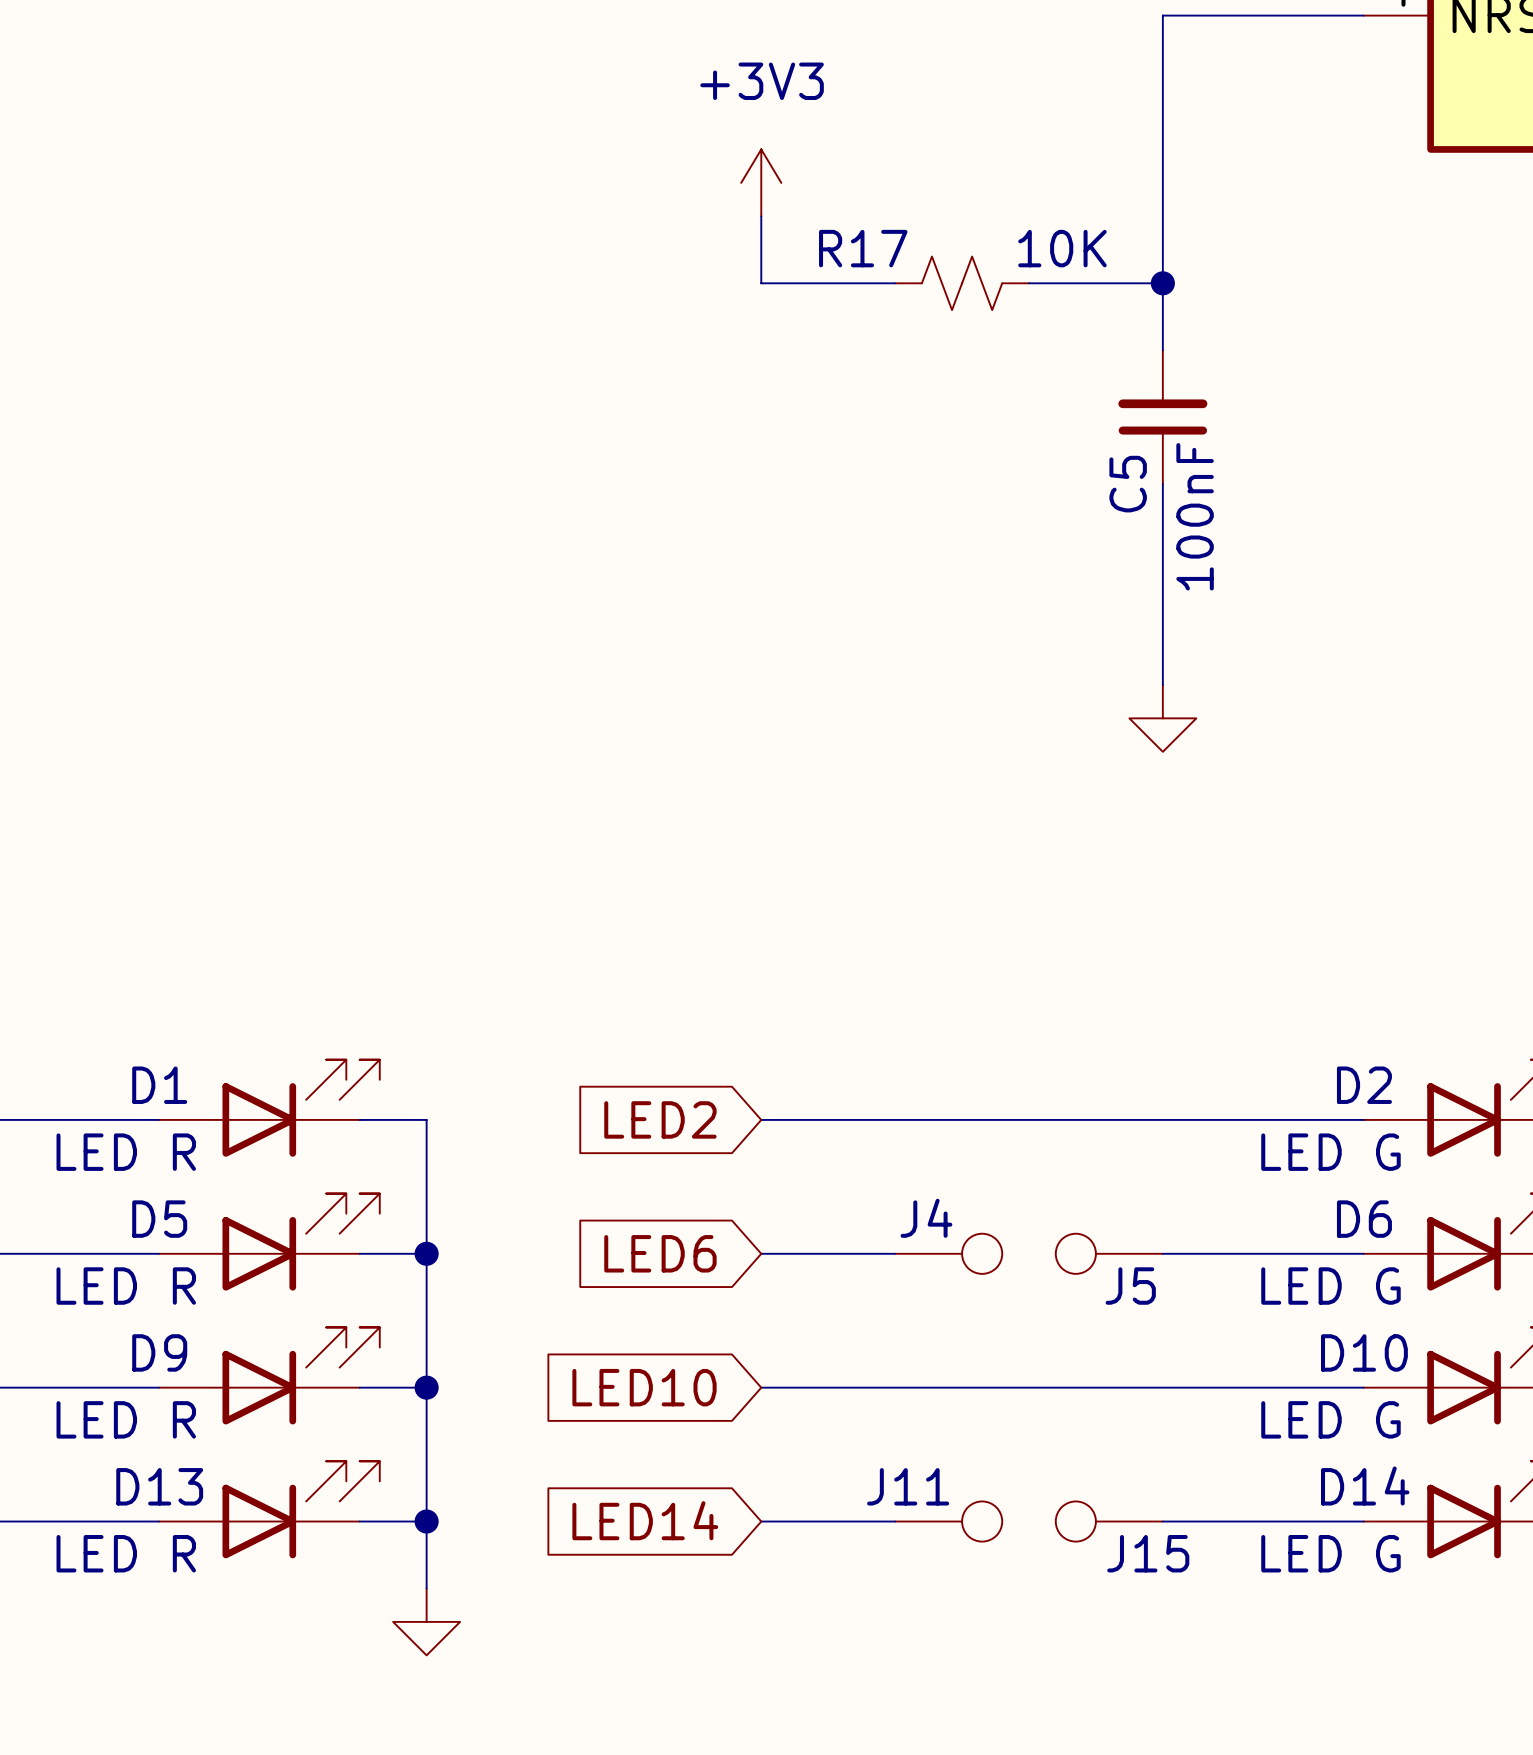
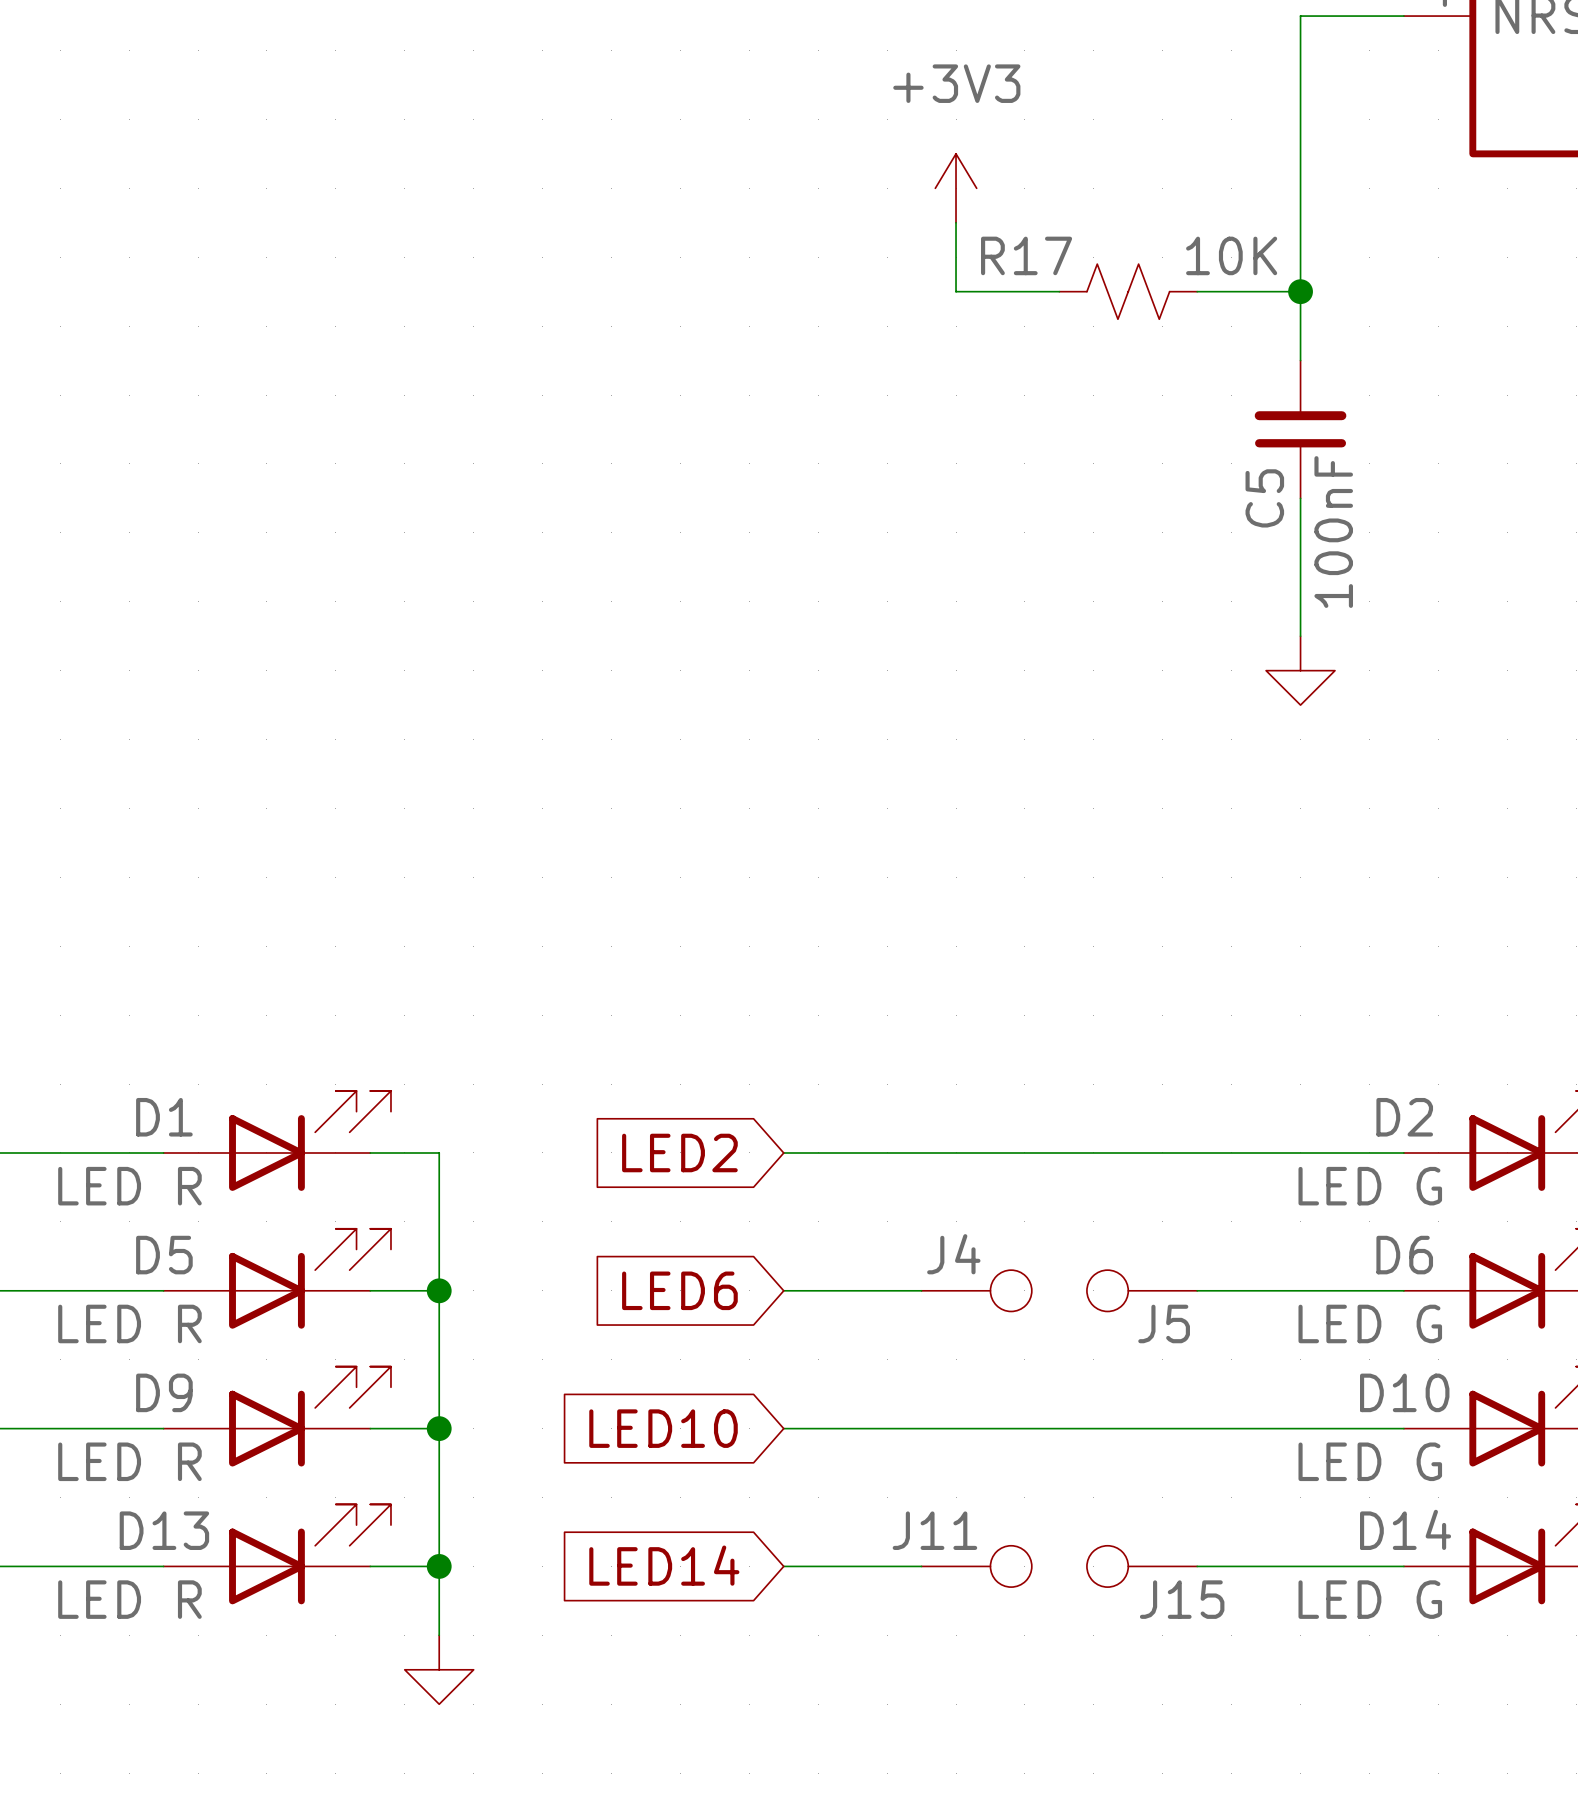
wire: (1263, 15) (1162, 15) (1162, 350) -> (1300, 16) (1300, 360)
power symbol position: +3V3 (761, 182) -> +3V3 (956, 188)
wire: (761, 216) (761, 283) (895, 283) -> none
wire: none -> (956, 222) (956, 291) (1059, 291)
R17 position: (962, 283) -> (1128, 291)
wire: (1029, 283) (1162, 283) -> (1300, 291) (1197, 291)
junction position: (1162, 283) -> (1300, 291)
C5 position: (1162, 417) -> (1300, 429)
wire: (1162, 484) (1162, 684) -> none
wire: none -> (1300, 498) (1300, 636)
power symbol position: (1162, 718) -> (1300, 670)

